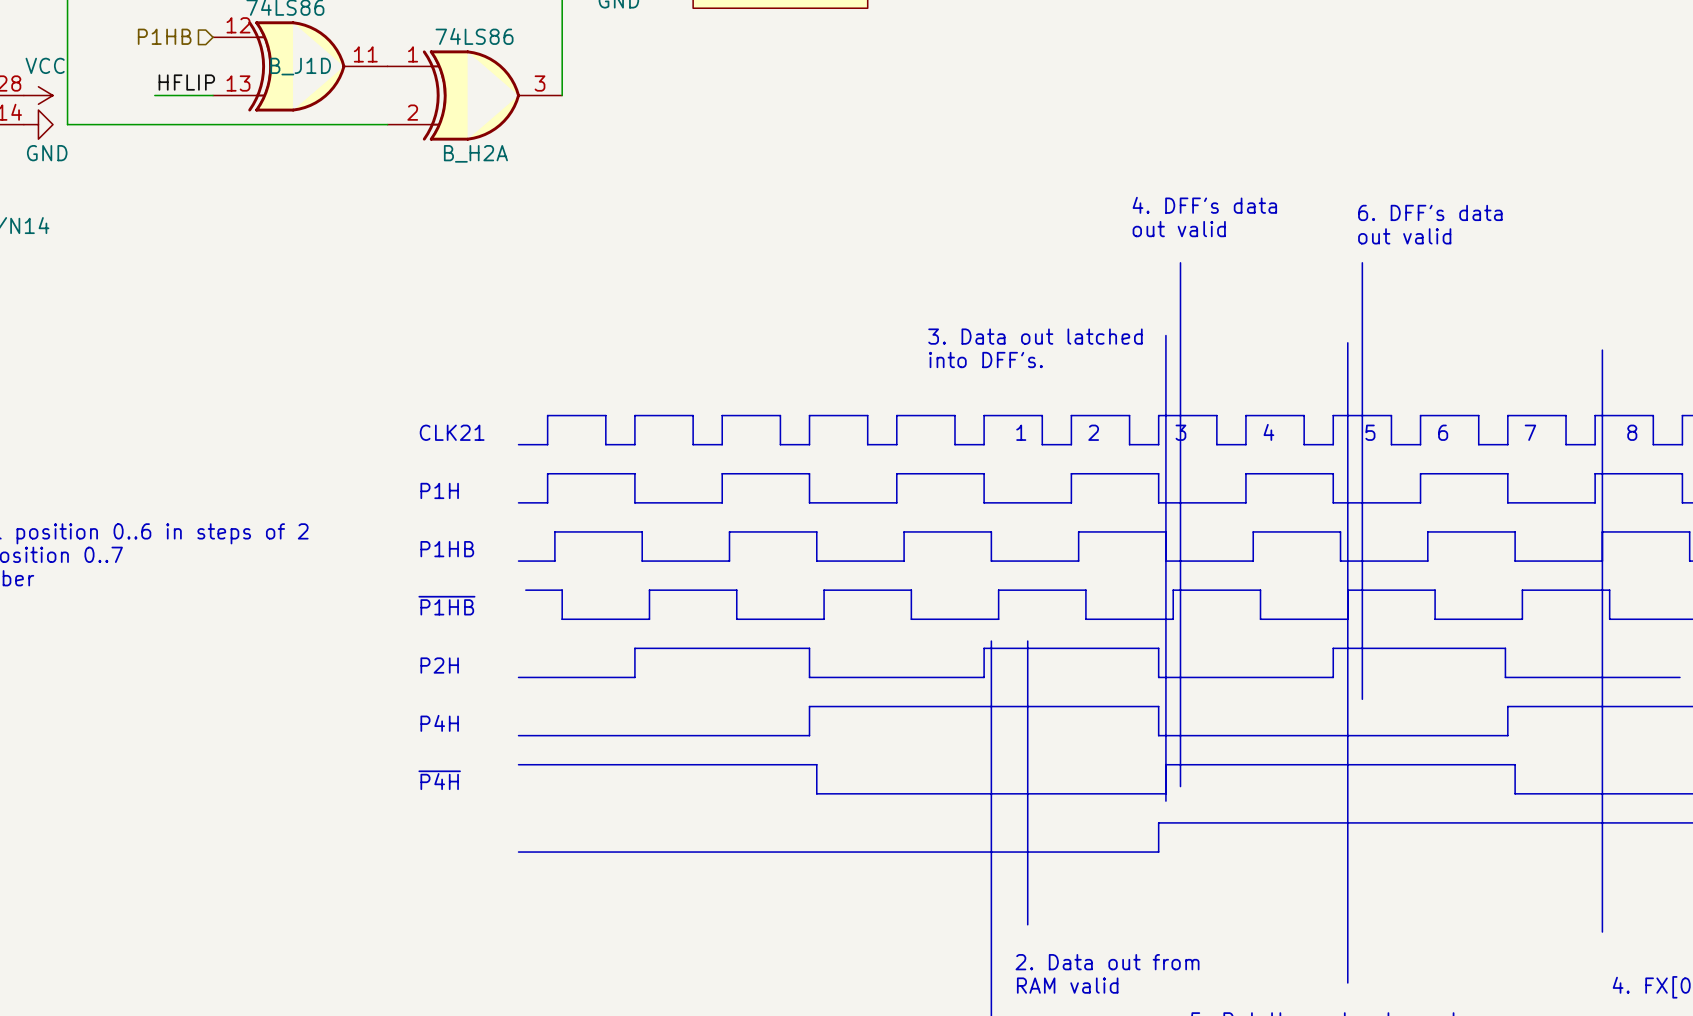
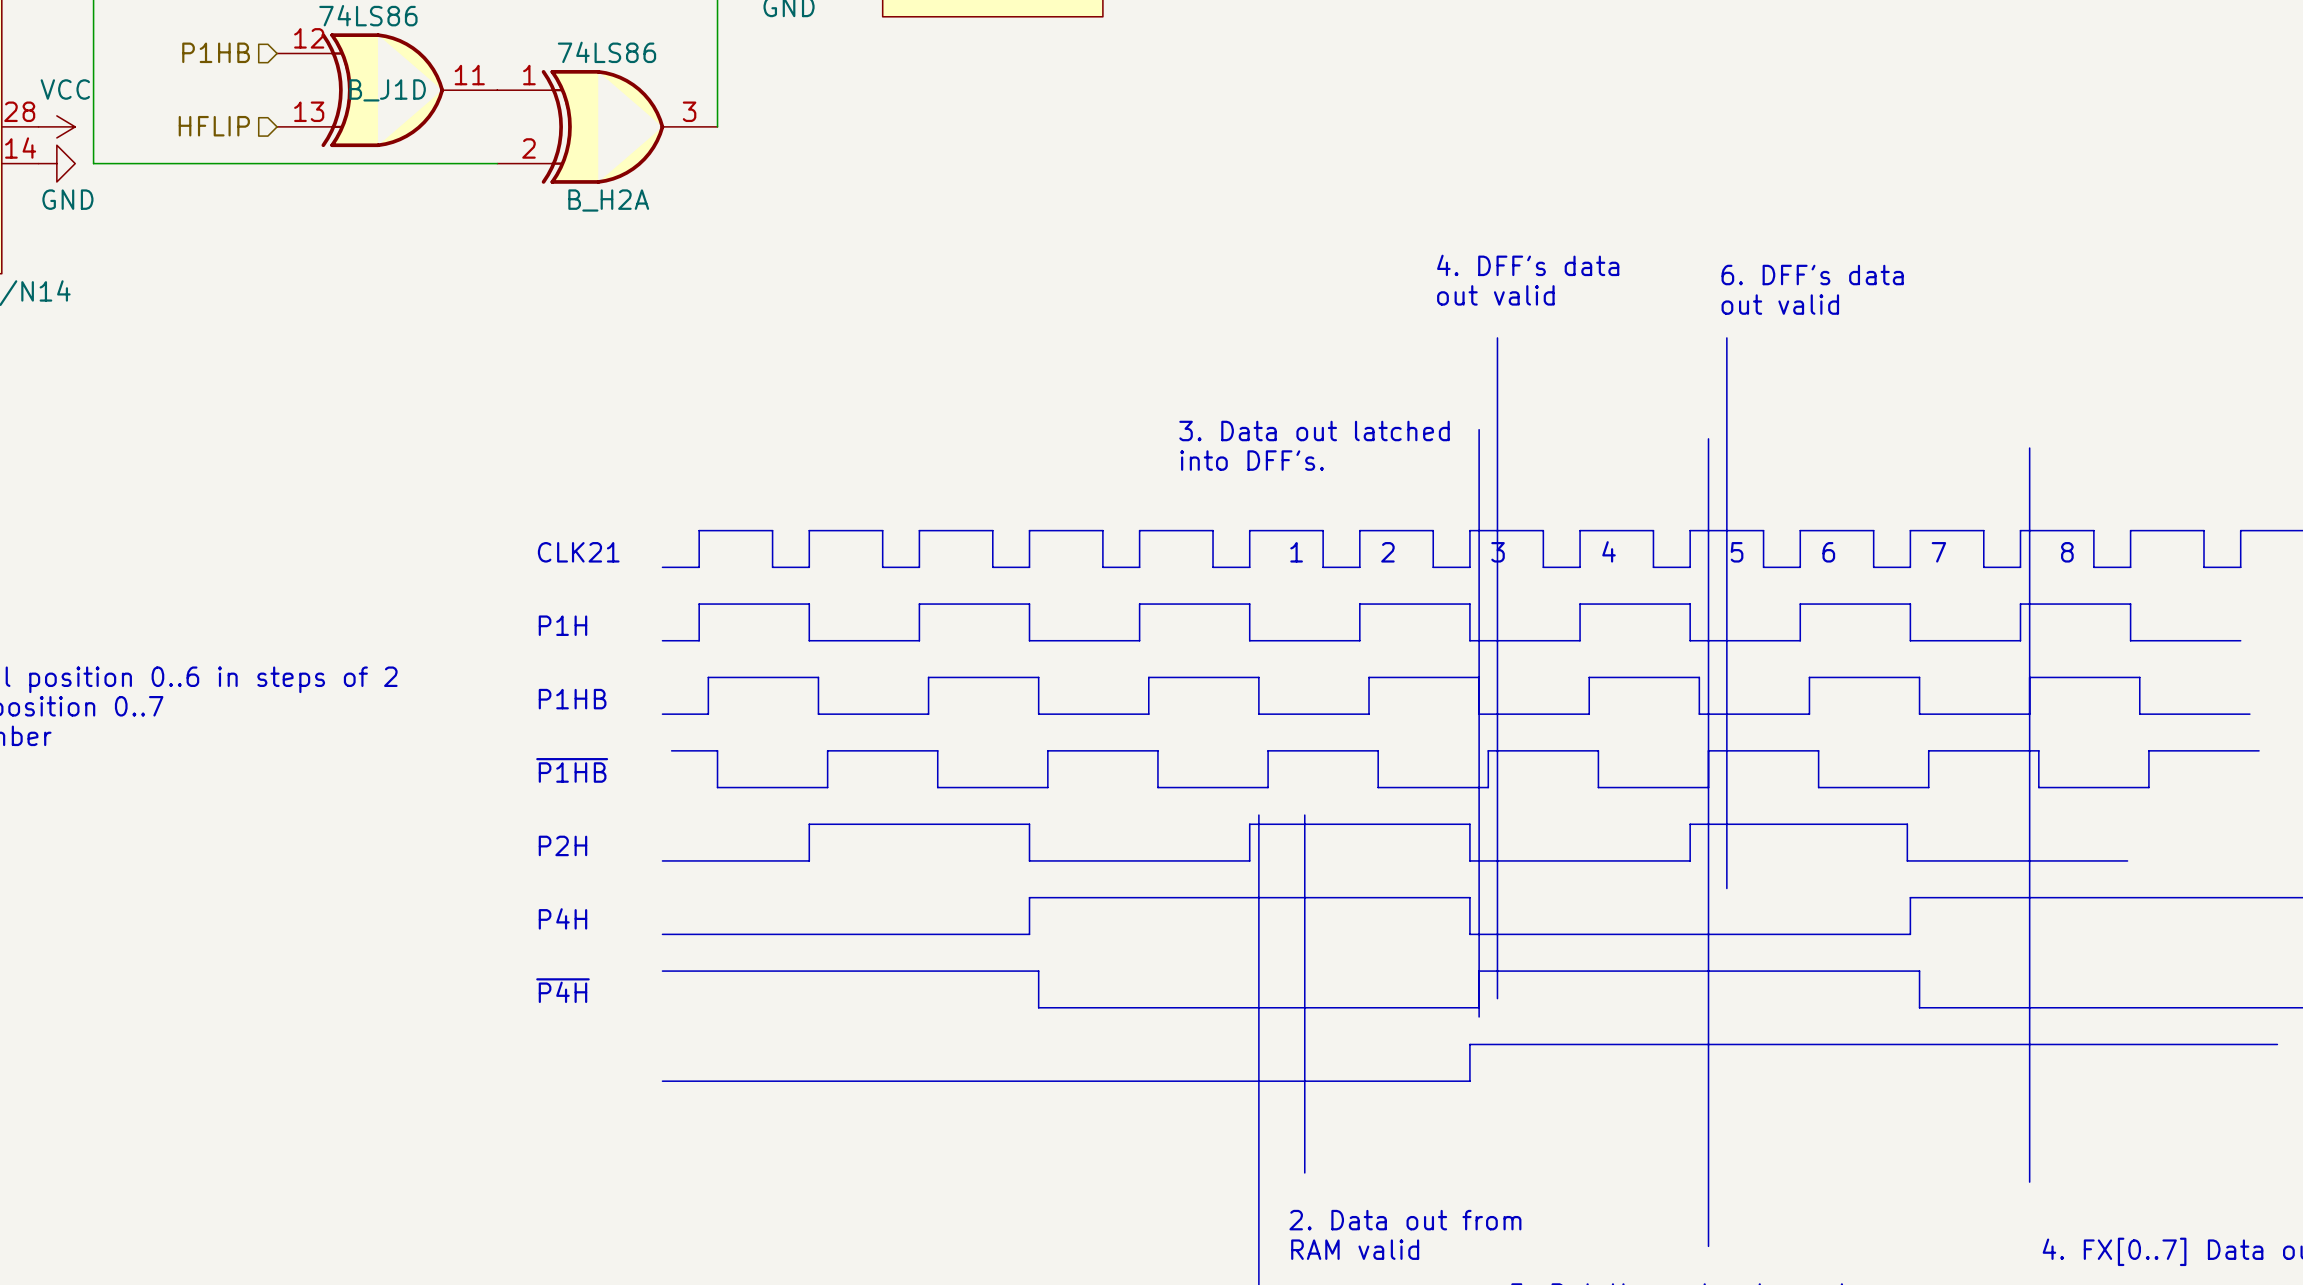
label: HFLIP (186, 82) -> none
hierarchical label: none -> HFLIP (214, 126)
wire: (154, 95) (213, 95) -> none

